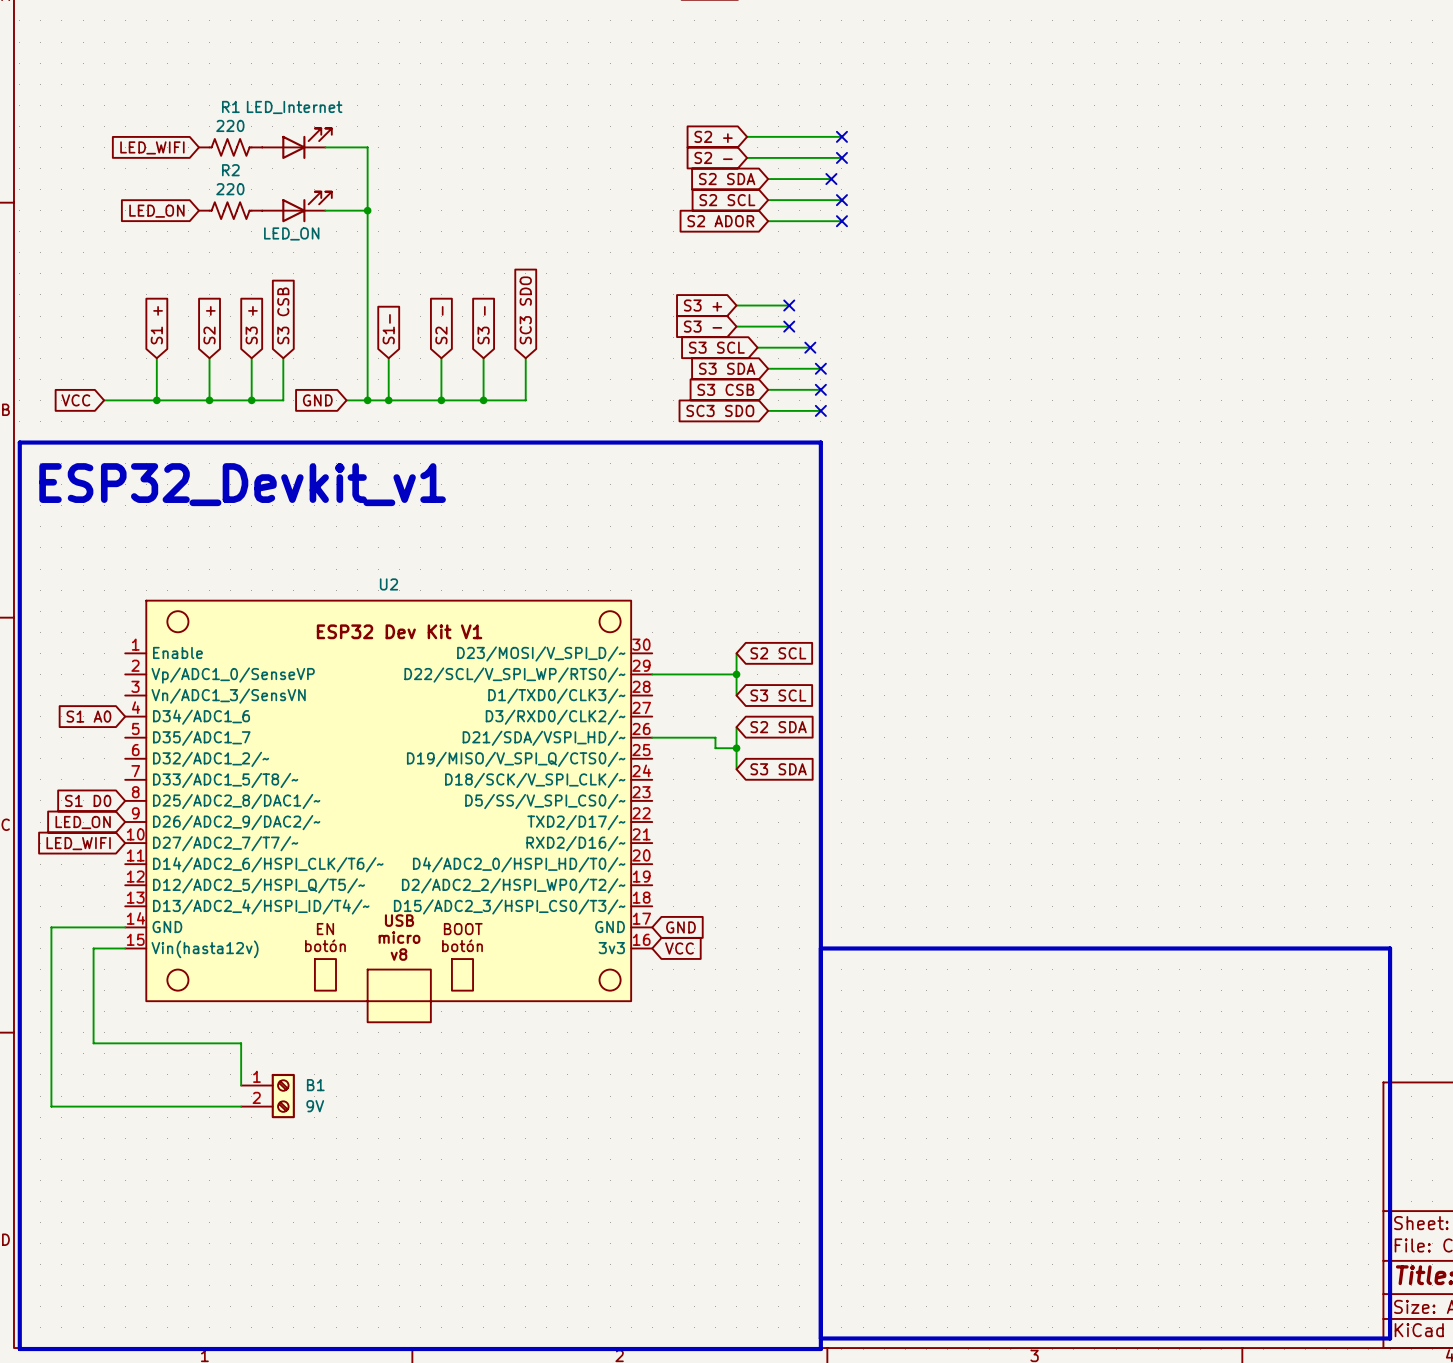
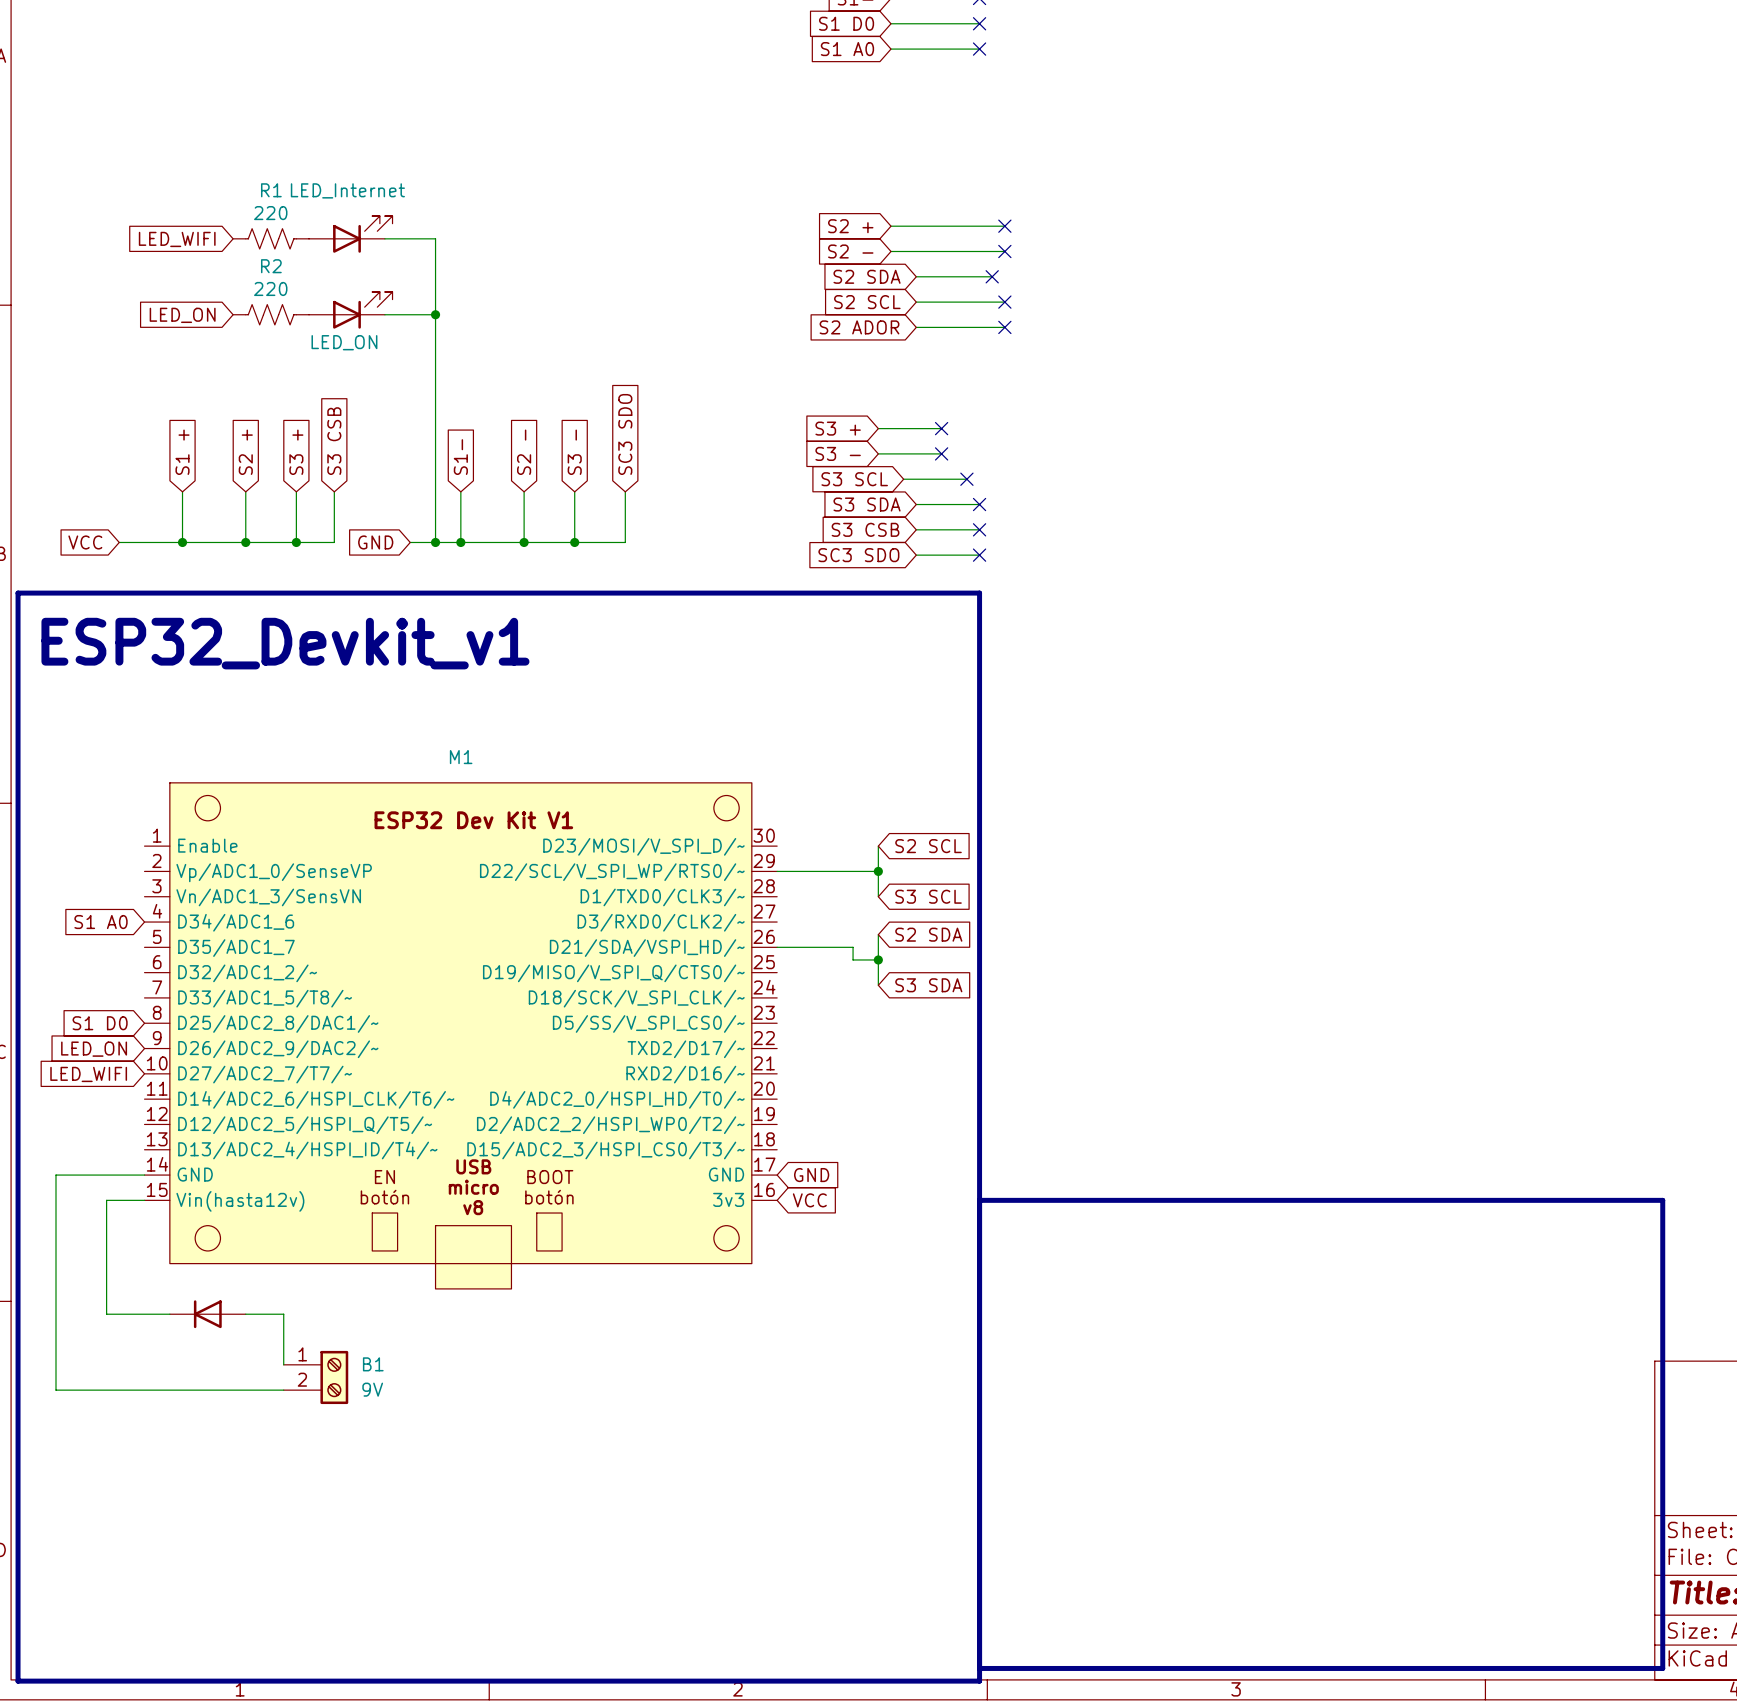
U2 name: U2 (388, 584) -> M1 (461, 757)
part: none -> (207, 1314)

